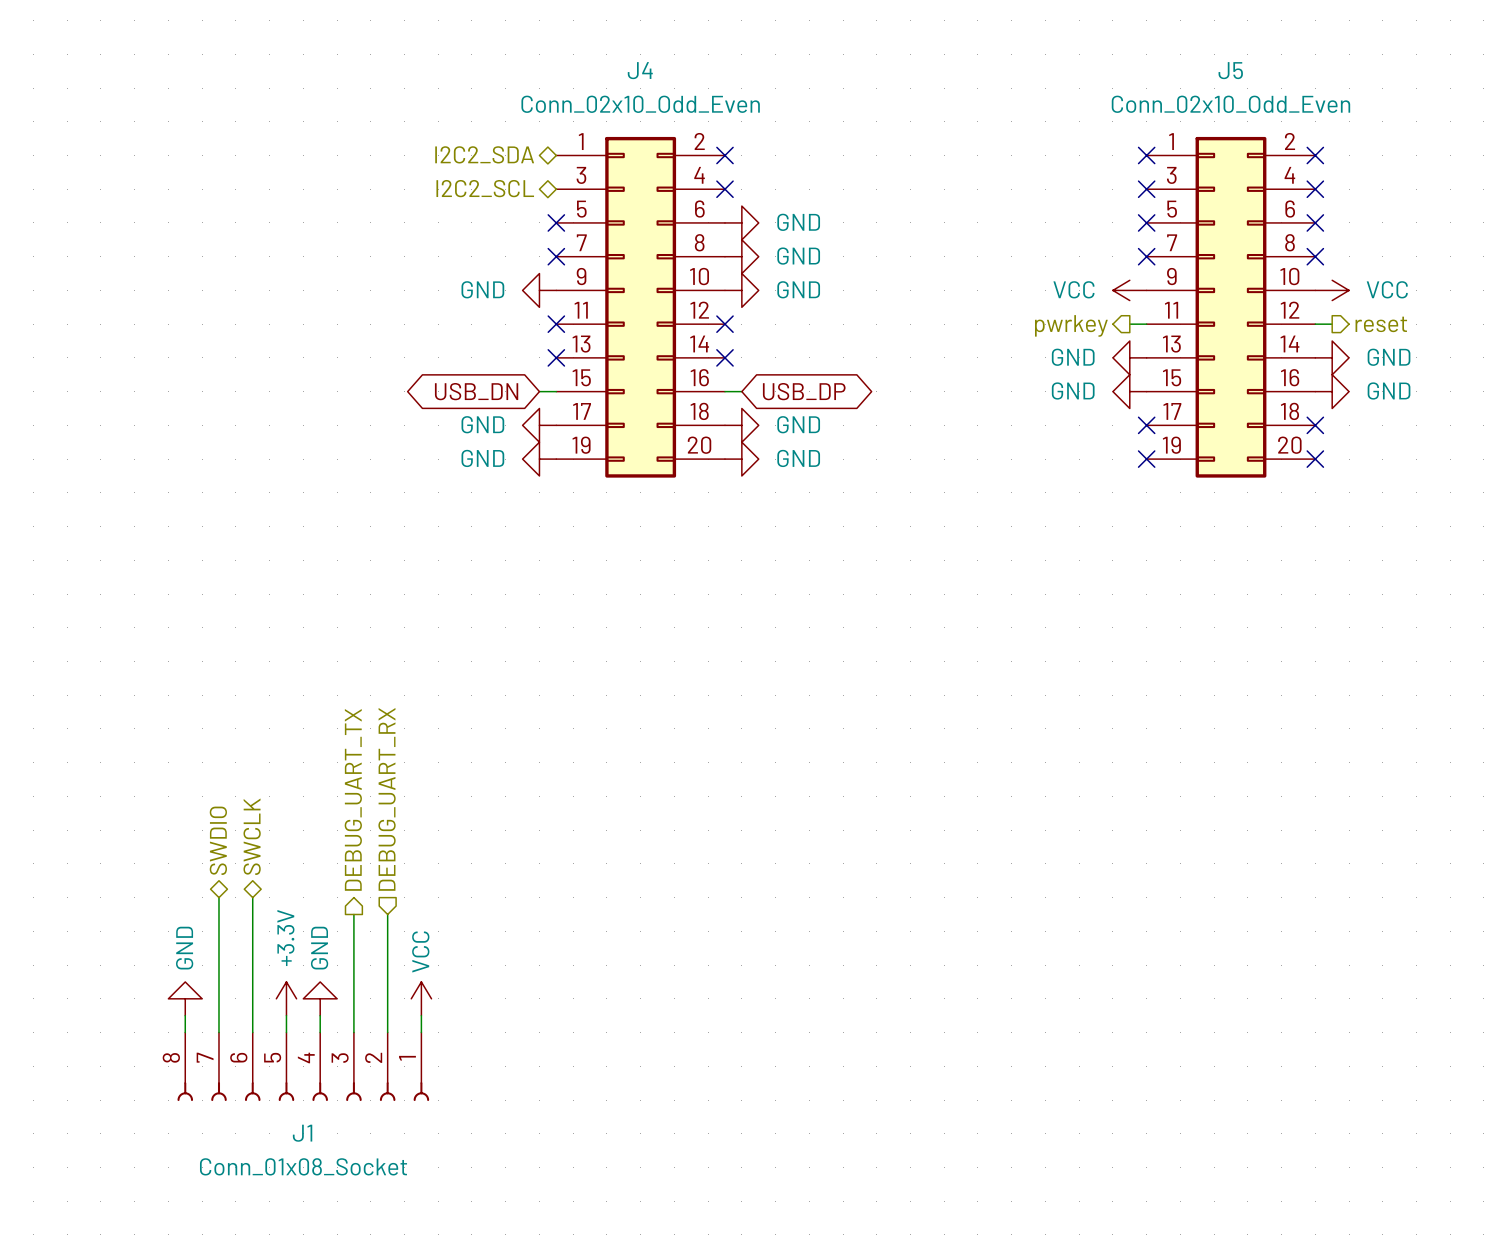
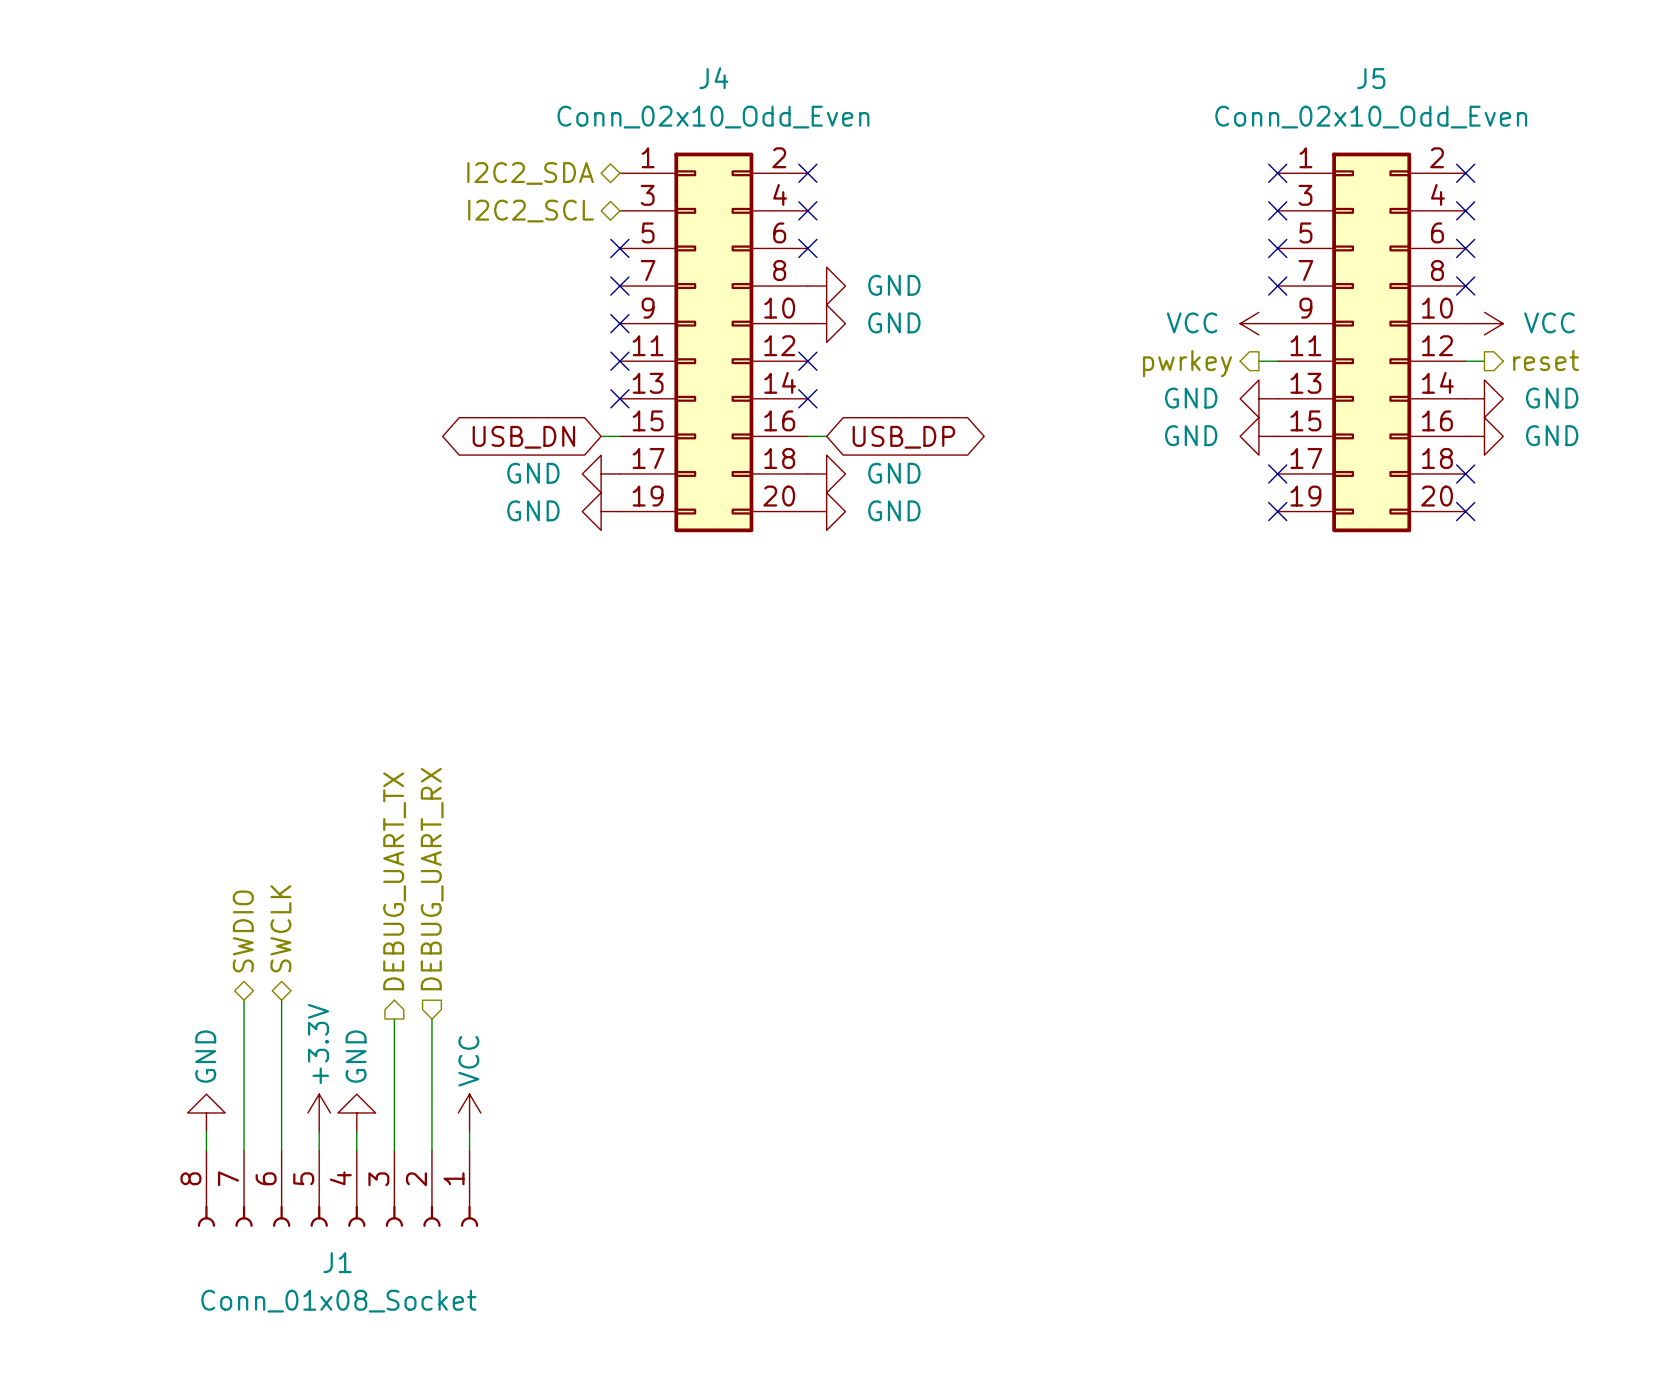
no-connect mark: none -> (807, 248)
power symbol: GND (741, 222) -> none
power symbol: GND (539, 290) -> none
no-connect mark: none -> (619, 323)

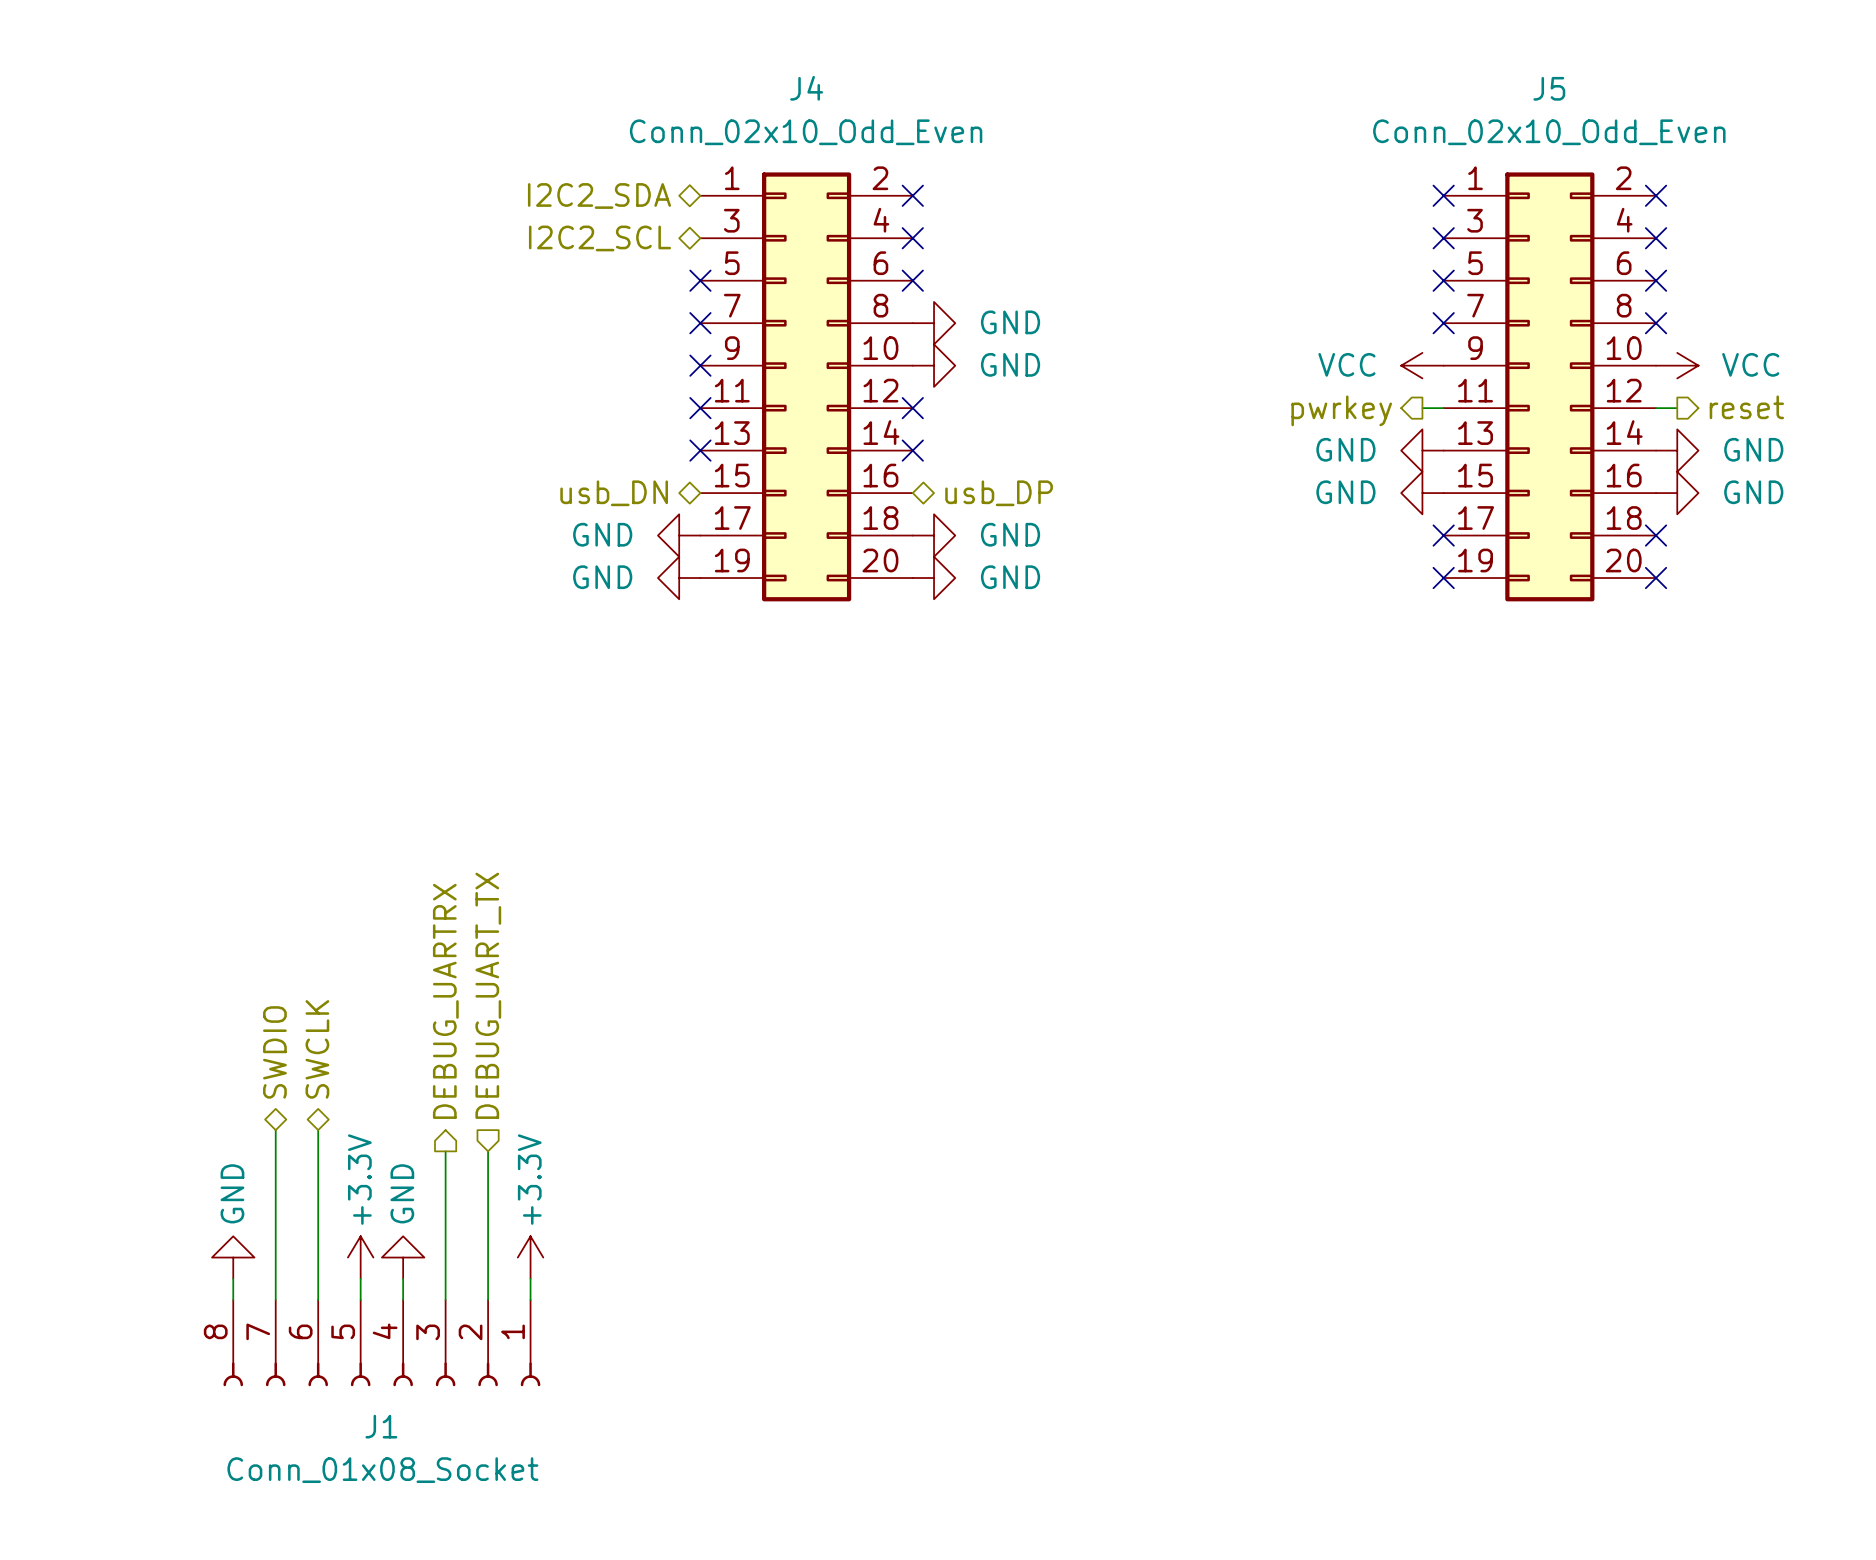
hierarchical label: none -> usb_DN (614, 493)
wire: (601, 436) (619, 436) -> none
wire: (807, 436) (826, 436) -> none
hierarchical label: none -> usb_DP (999, 493)
global label: USB_DN (523, 437) -> none
global label: USB_DP (903, 437) -> none
hierarchical label: DEBUG_UART_RX (432, 879) -> DEBUG_UART_TX (488, 995)
hierarchical label: DEBUG_UART_TX (394, 881) -> DEBUG_UARTRX (445, 1001)
power symbol: VCC (469, 1112) -> +3.3V (530, 1257)

